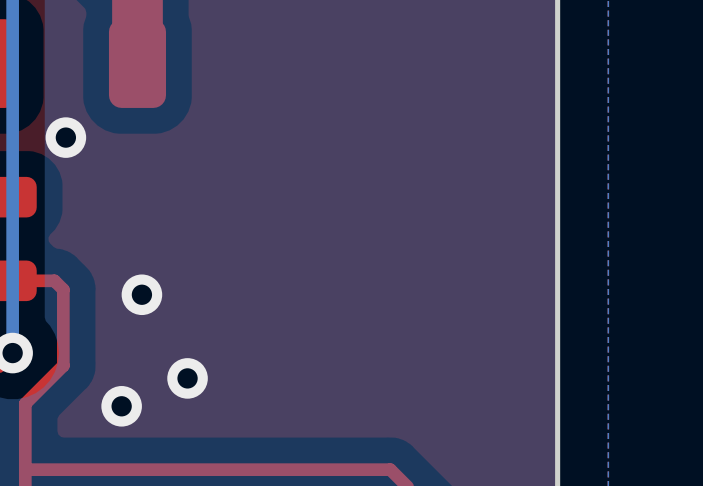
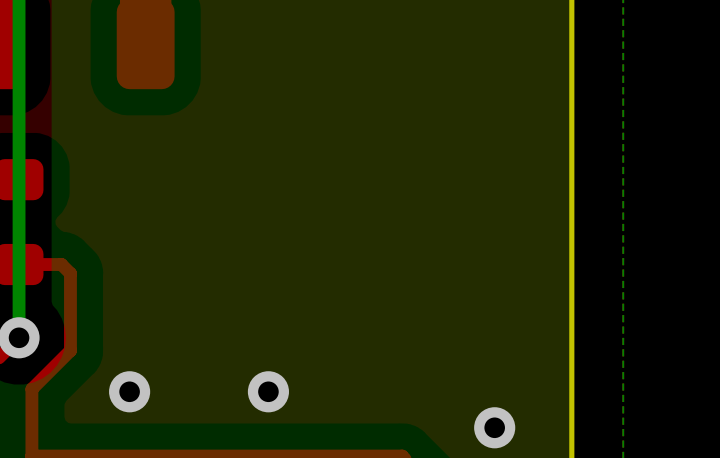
via: (65, 137) -> none
via: (141, 294) -> none
via position: (187, 378) -> (268, 391)
via: none -> (494, 427)

